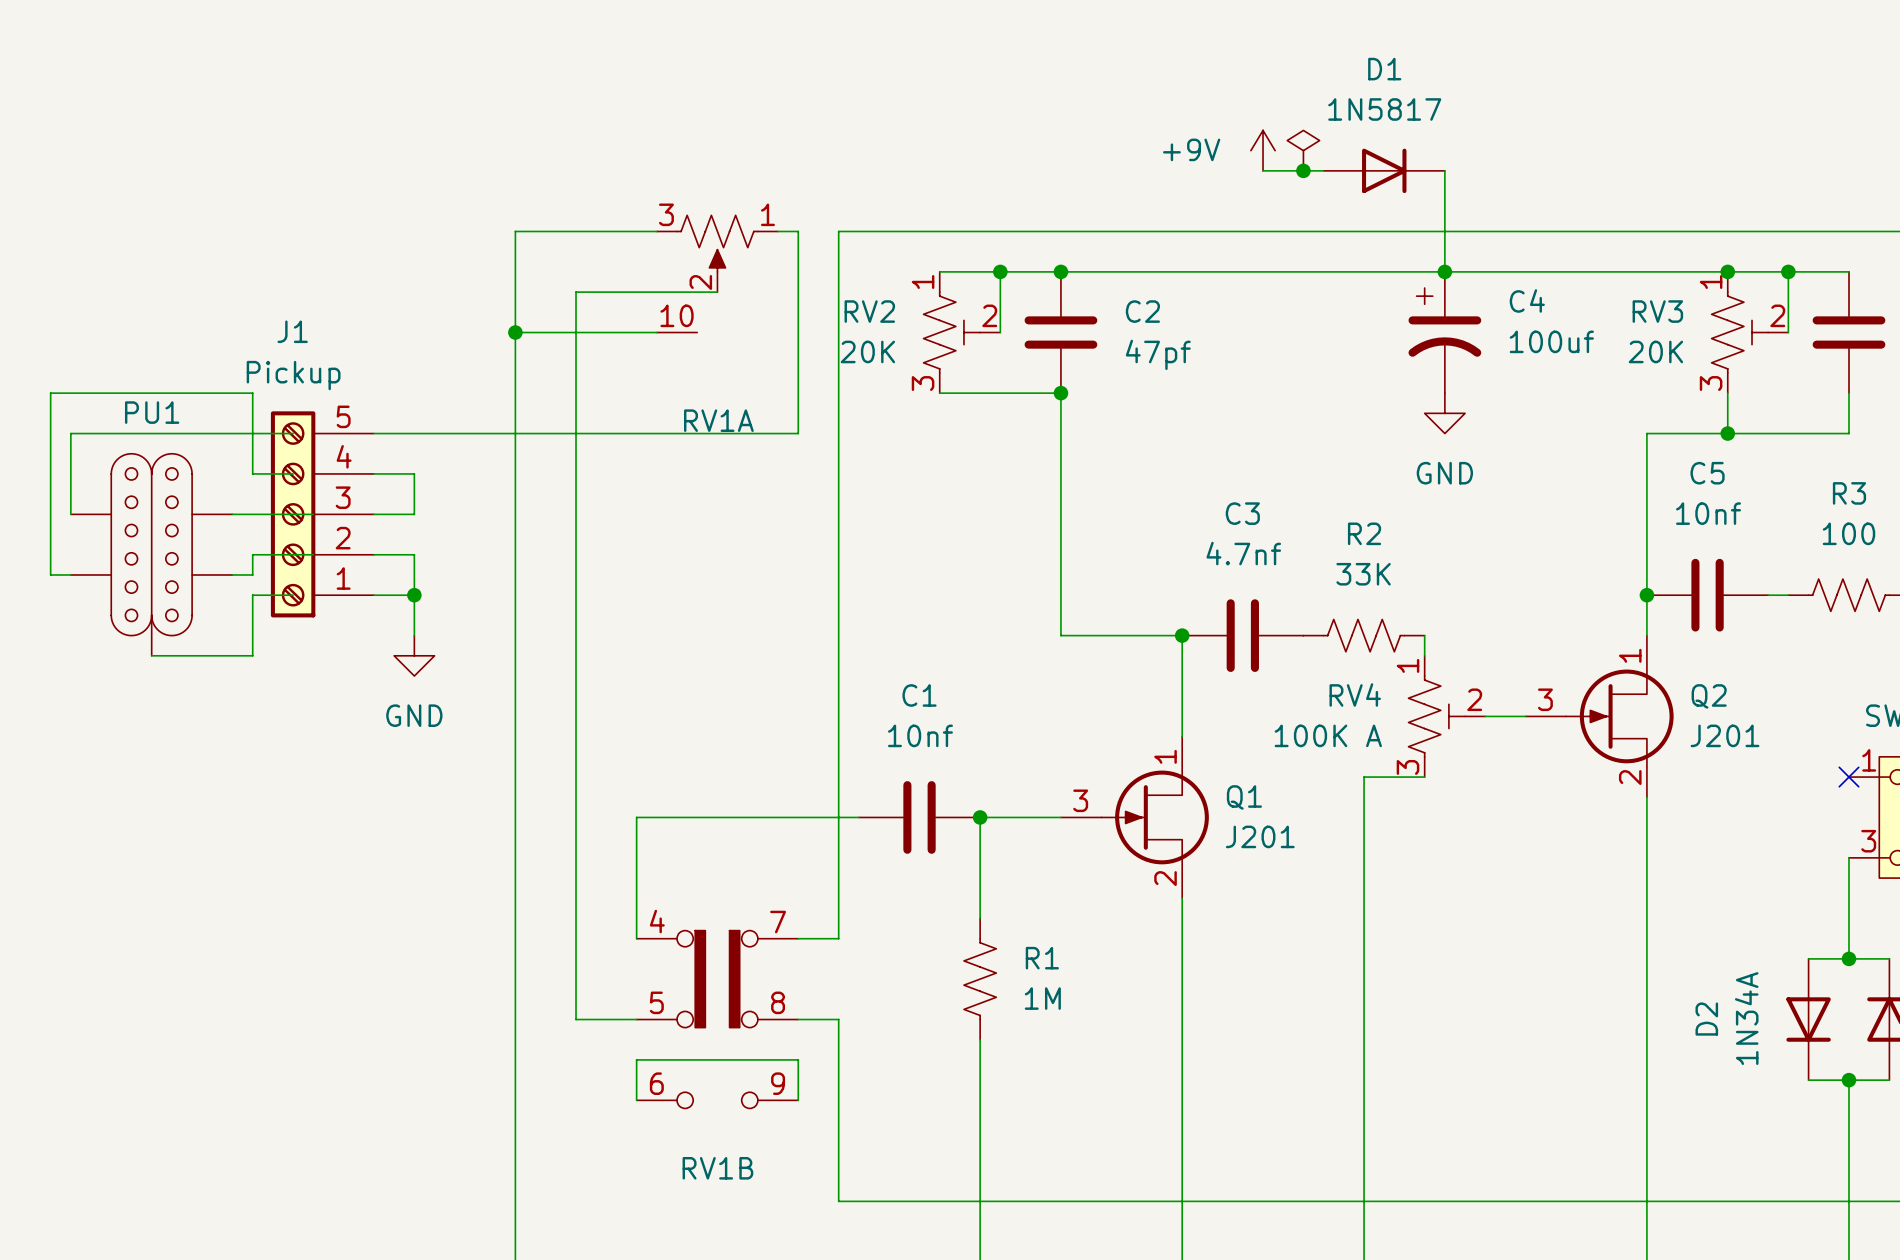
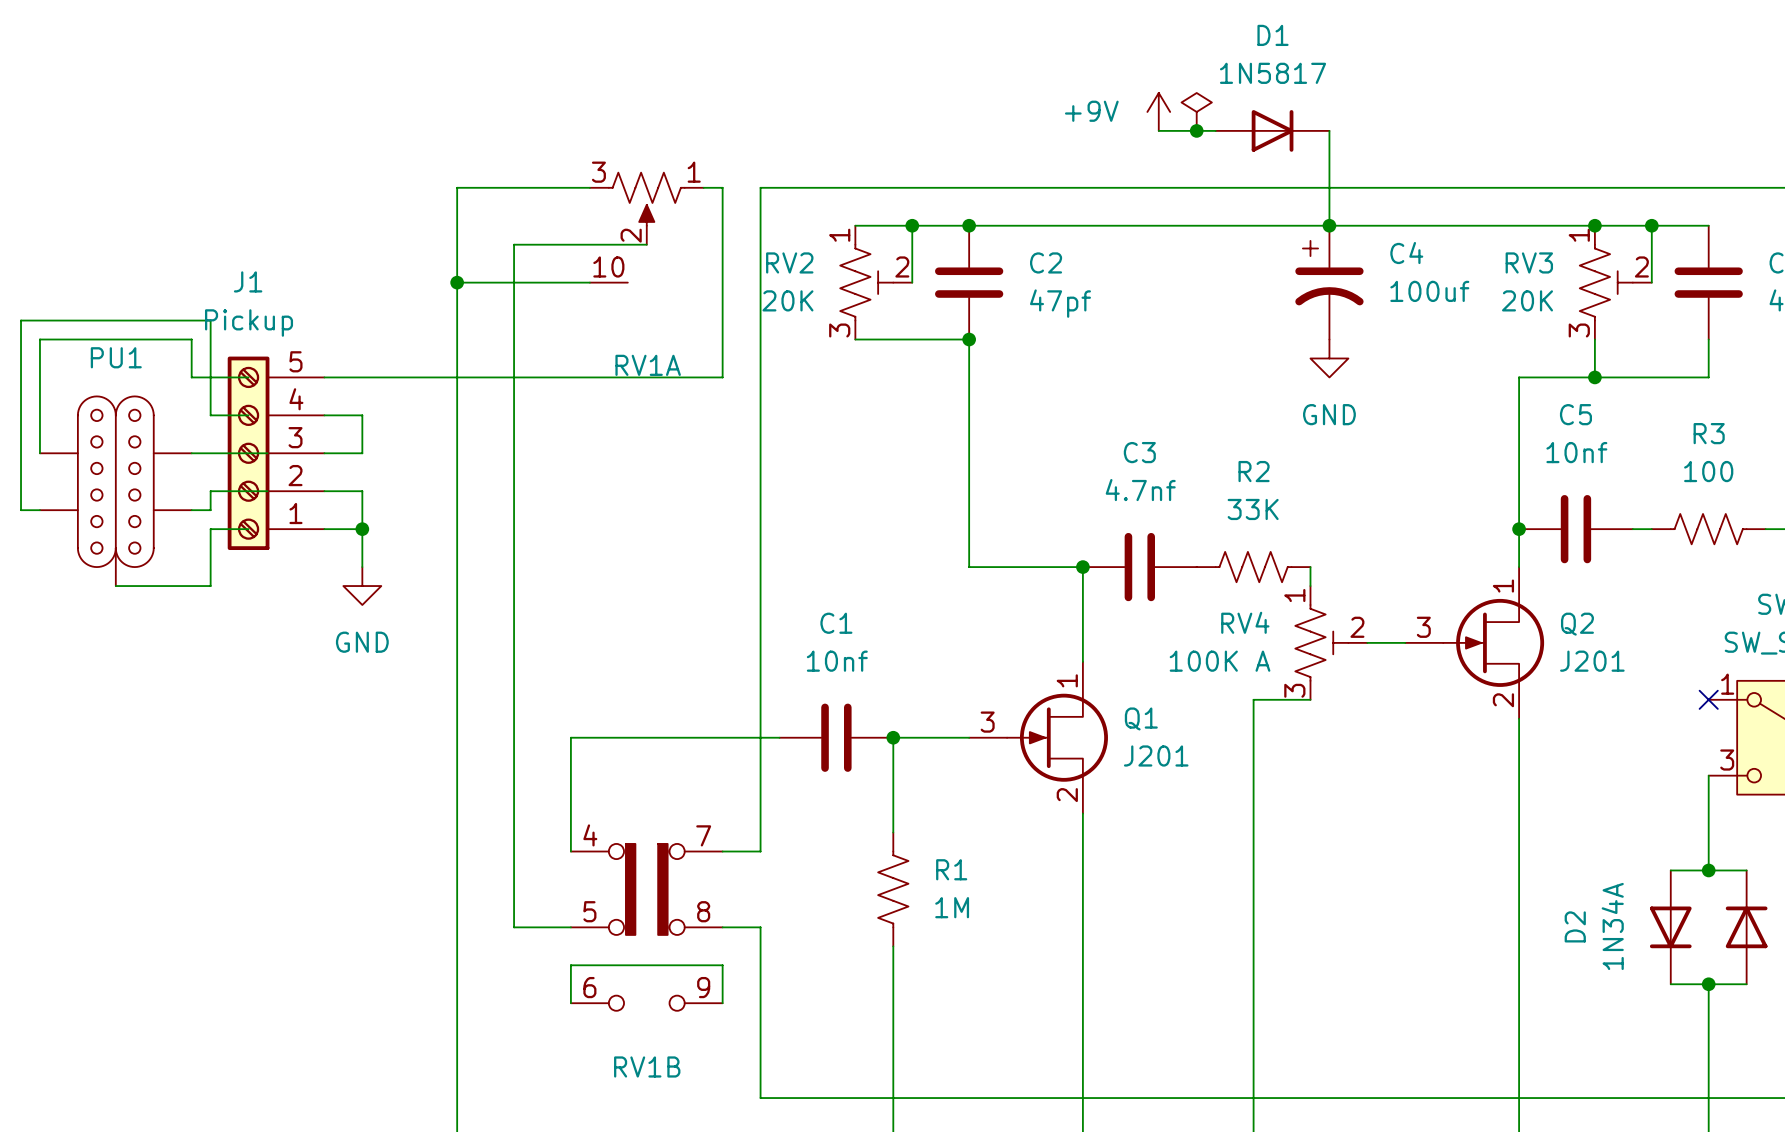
wire: (50, 393) (70, 393) -> (39, 377) (39, 339)
wire: none -> (21, 339) (21, 320) (210, 320) (210, 339)
wire: (232, 393) (252, 393) -> (191, 339) (191, 377)
wire: (70, 433) (232, 433) -> none

